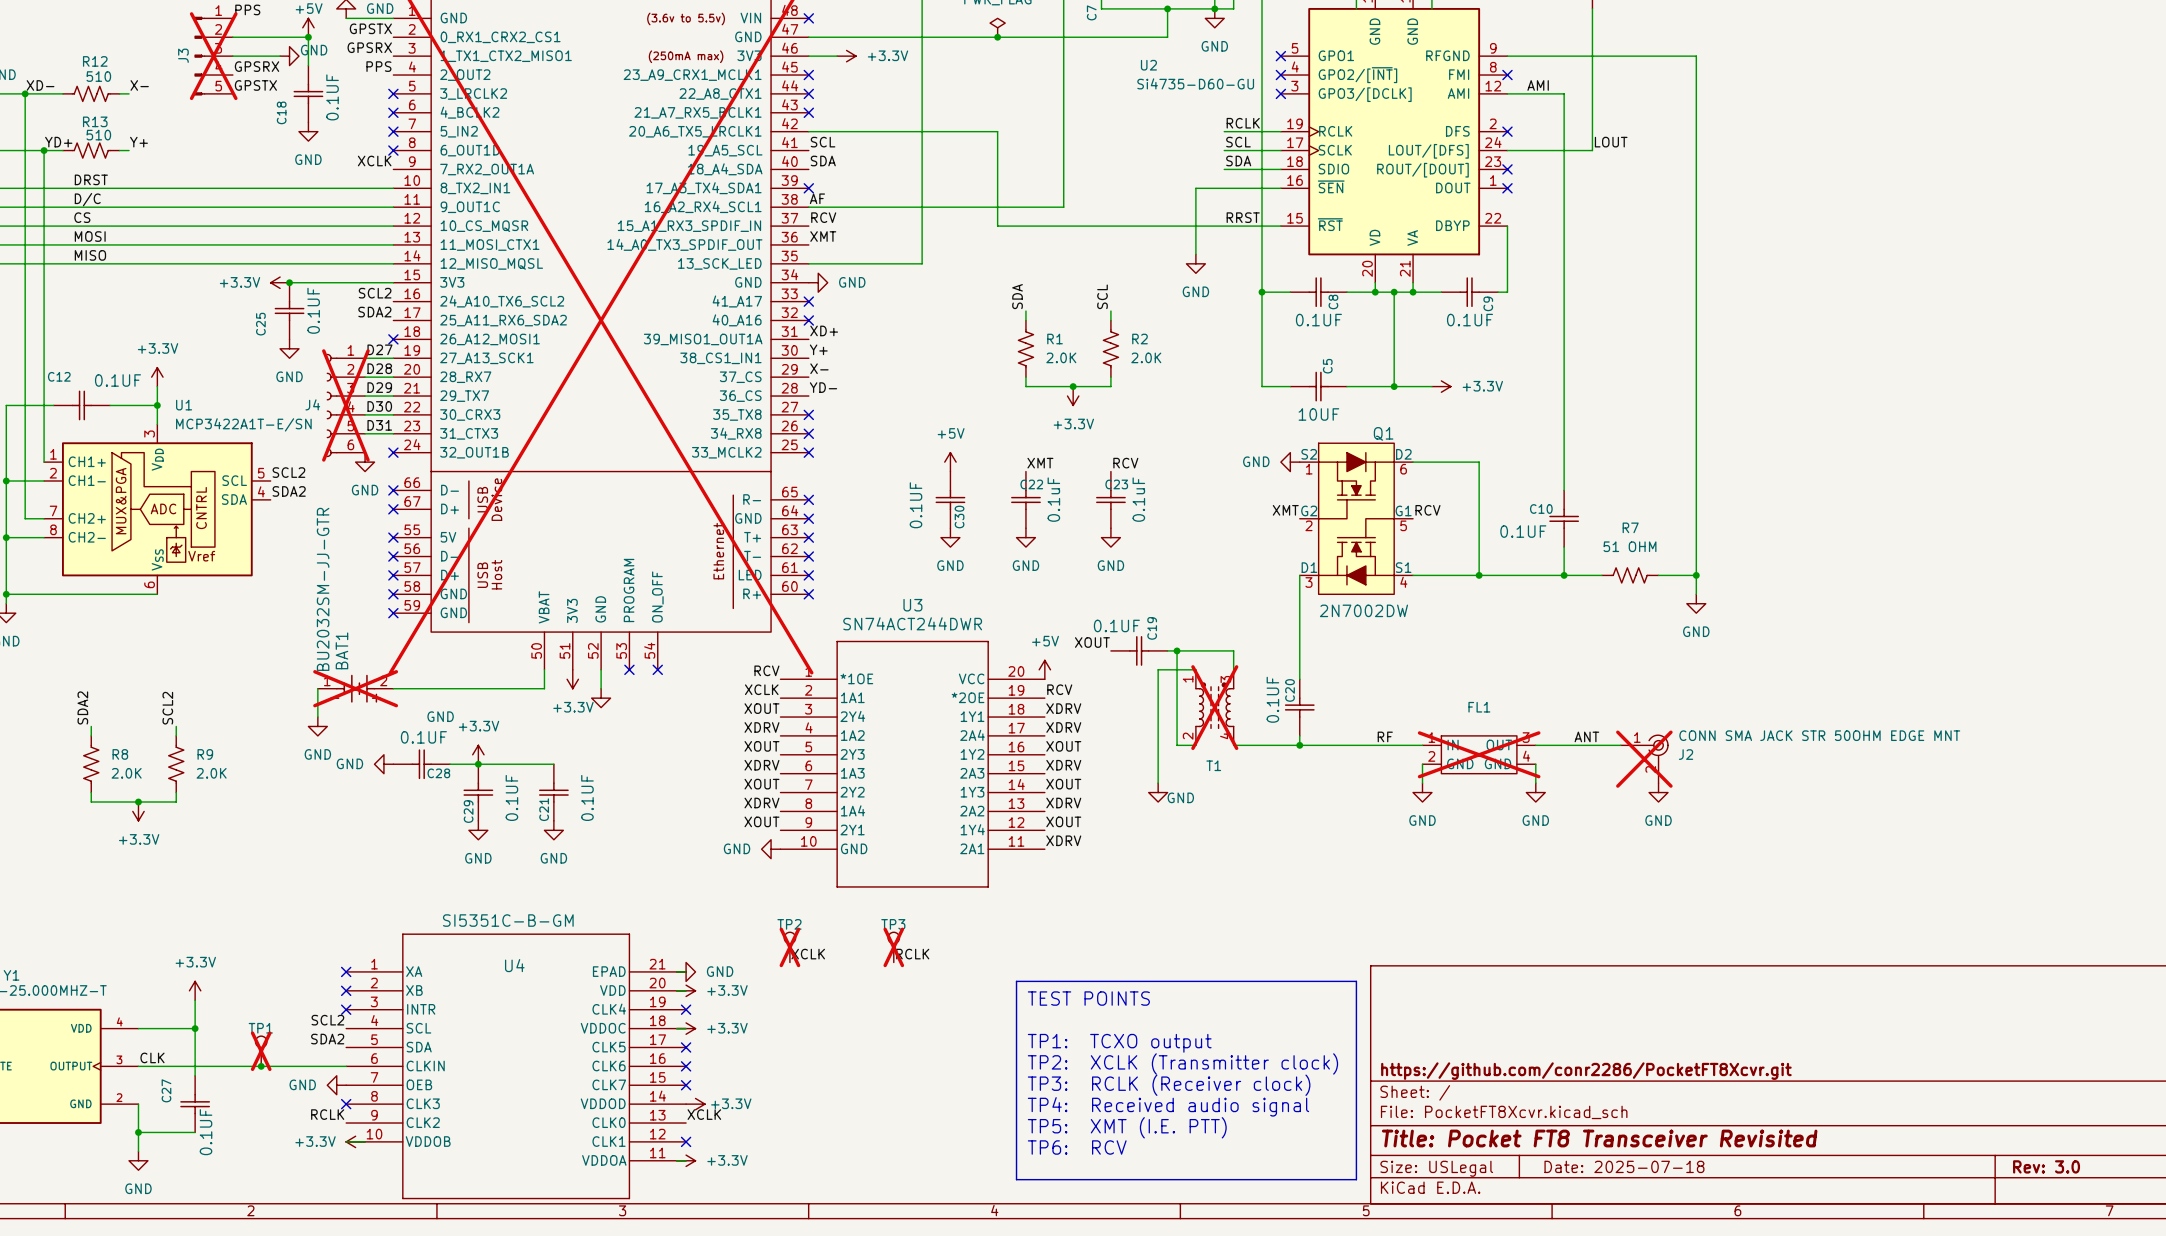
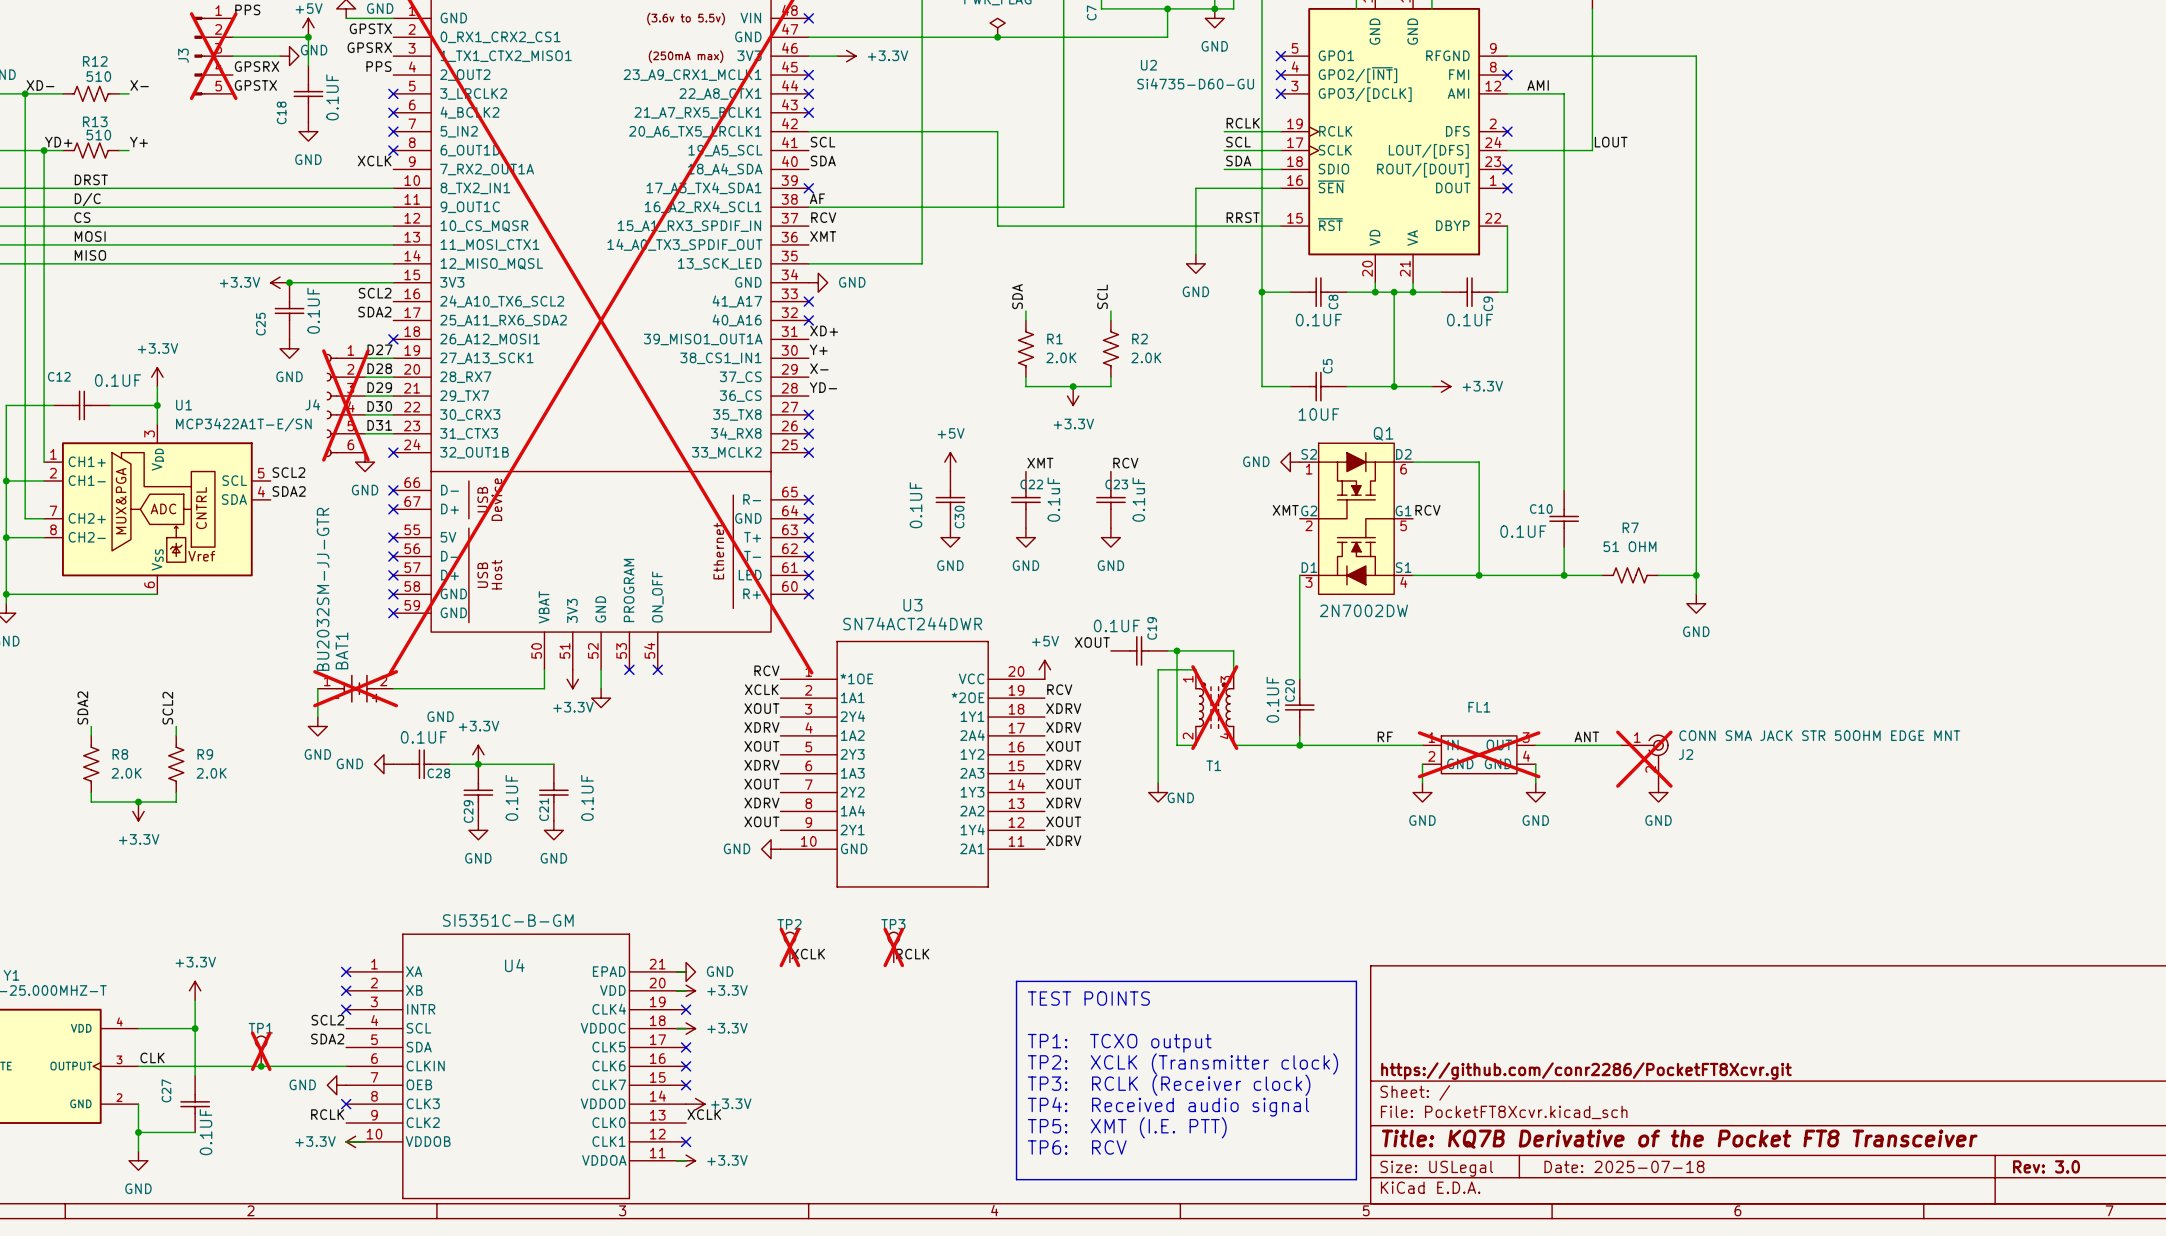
title block: Title: Pocket FT8 Transceiver Revisited (1599, 1138) -> Title: KQ7B Derivative of the Pocket FT8 Transceiver (1679, 1139)

